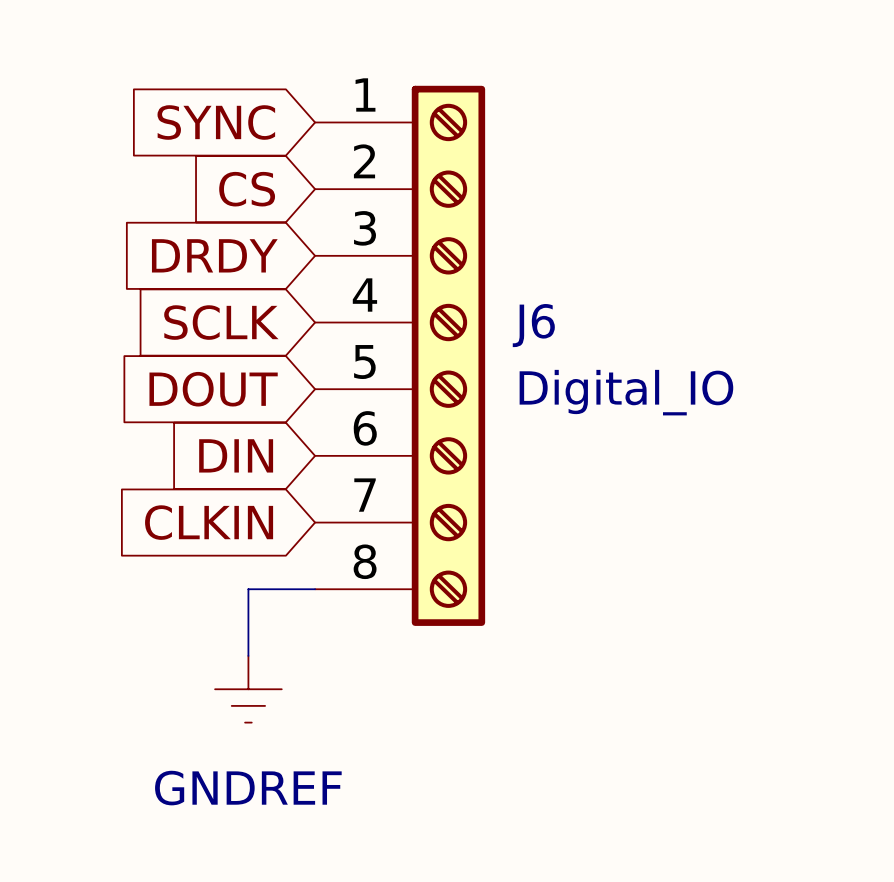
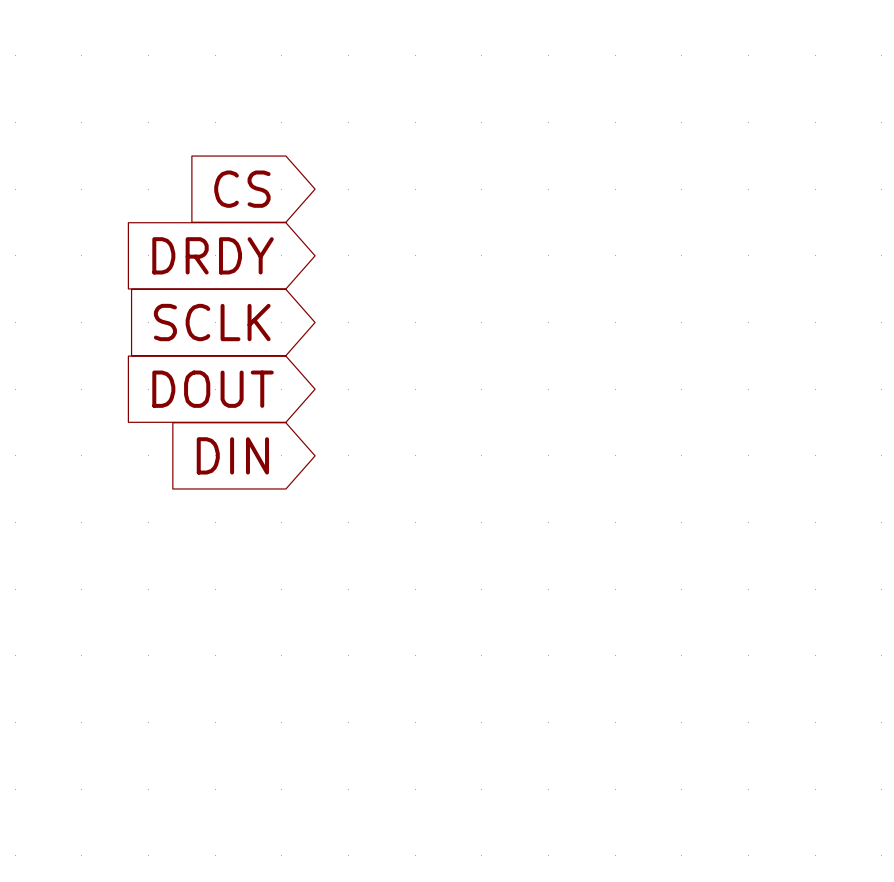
global label: SYNC (216, 122) -> none
J6: Digital_IO (400, 355) -> none
global label: CLKIN (209, 522) -> none
wire: (315, 589) (248, 589) (248, 655) -> none
power symbol: GNDREF (248, 689) -> none

